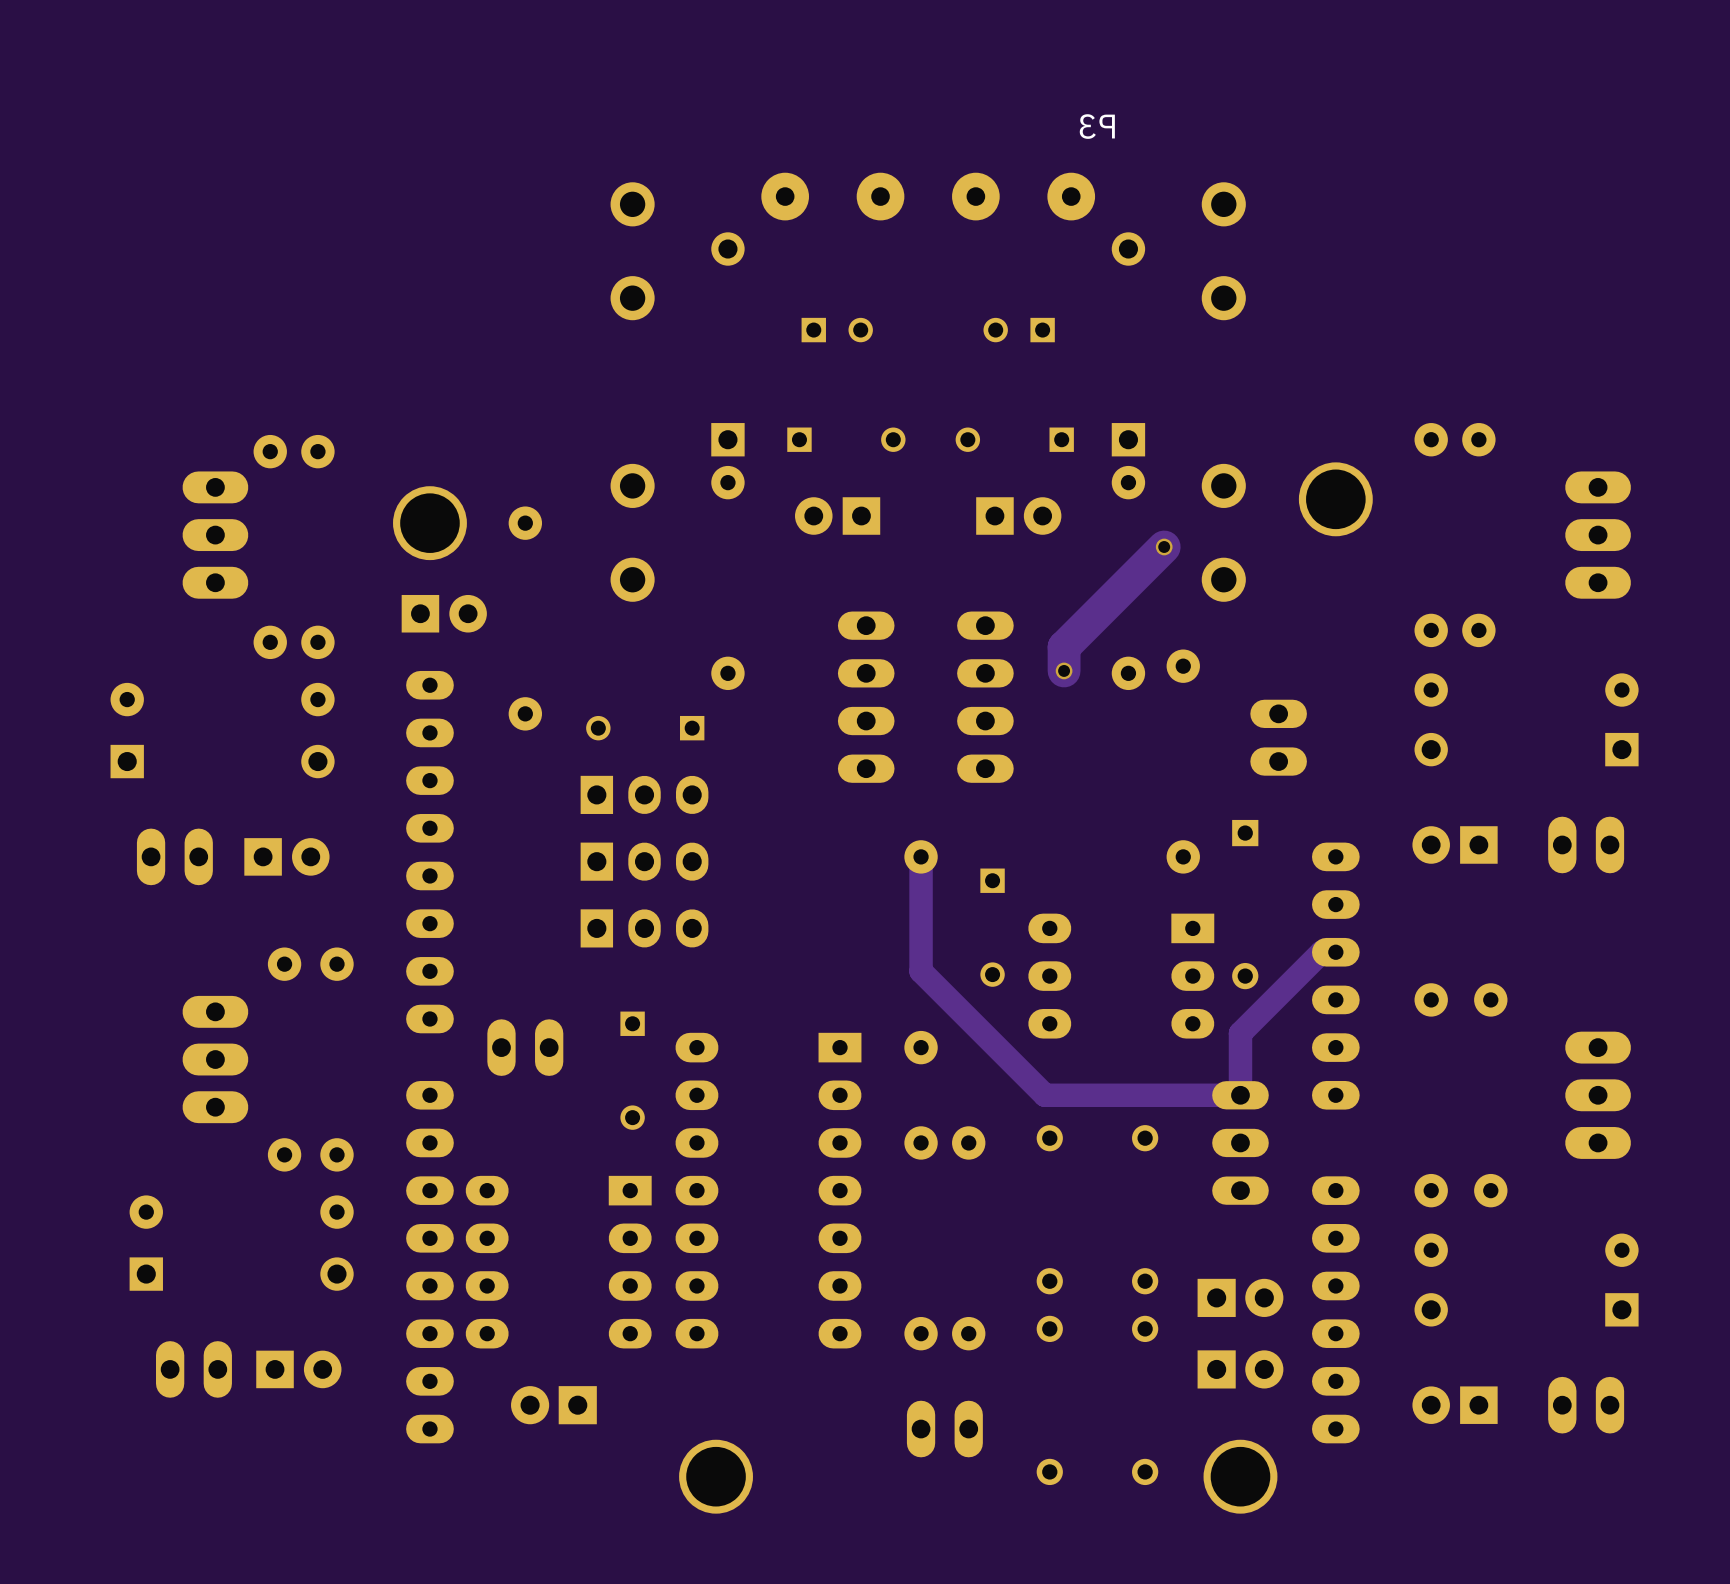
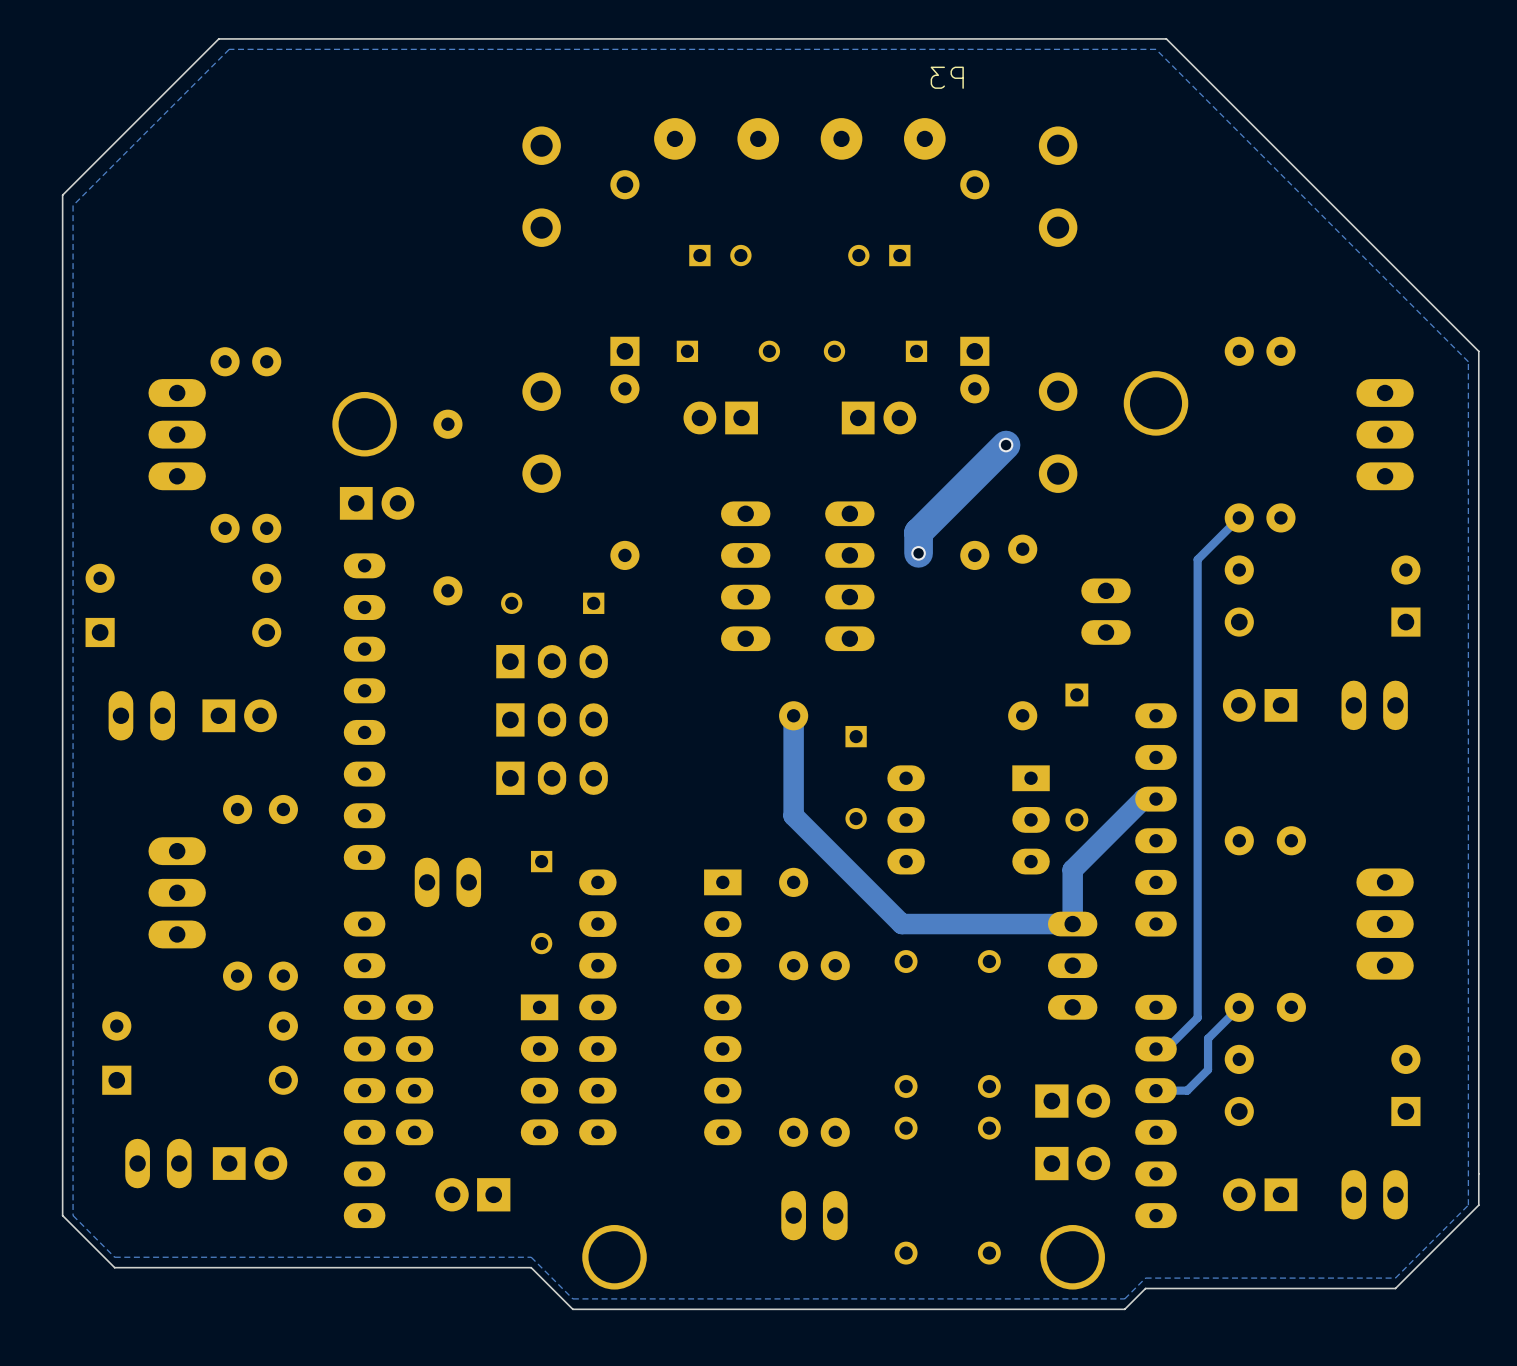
board edge: none -> (1166, 38) (218, 38) (62, 195) (62, 1215) (114, 1267) (531, 1267) (572, 1309) (1124, 1309) (1145, 1288) (1395, 1288) (1478, 1205) (1478, 351) (1166, 38)
zone outline: none -> (1155, 49) (229, 49) (73, 205) (73, 1215) (114, 1257) (531, 1257) (572, 1298) (1124, 1298) (1145, 1278) (1395, 1278) (1468, 1205) (1468, 361) (1155, 49)
track: none -> (1239, 517) (1197, 559) (1197, 1017) (1166, 1049) (1155, 1049)
track: none -> (1239, 1007) (1208, 1038) (1208, 1069) (1187, 1090) (1155, 1090)

